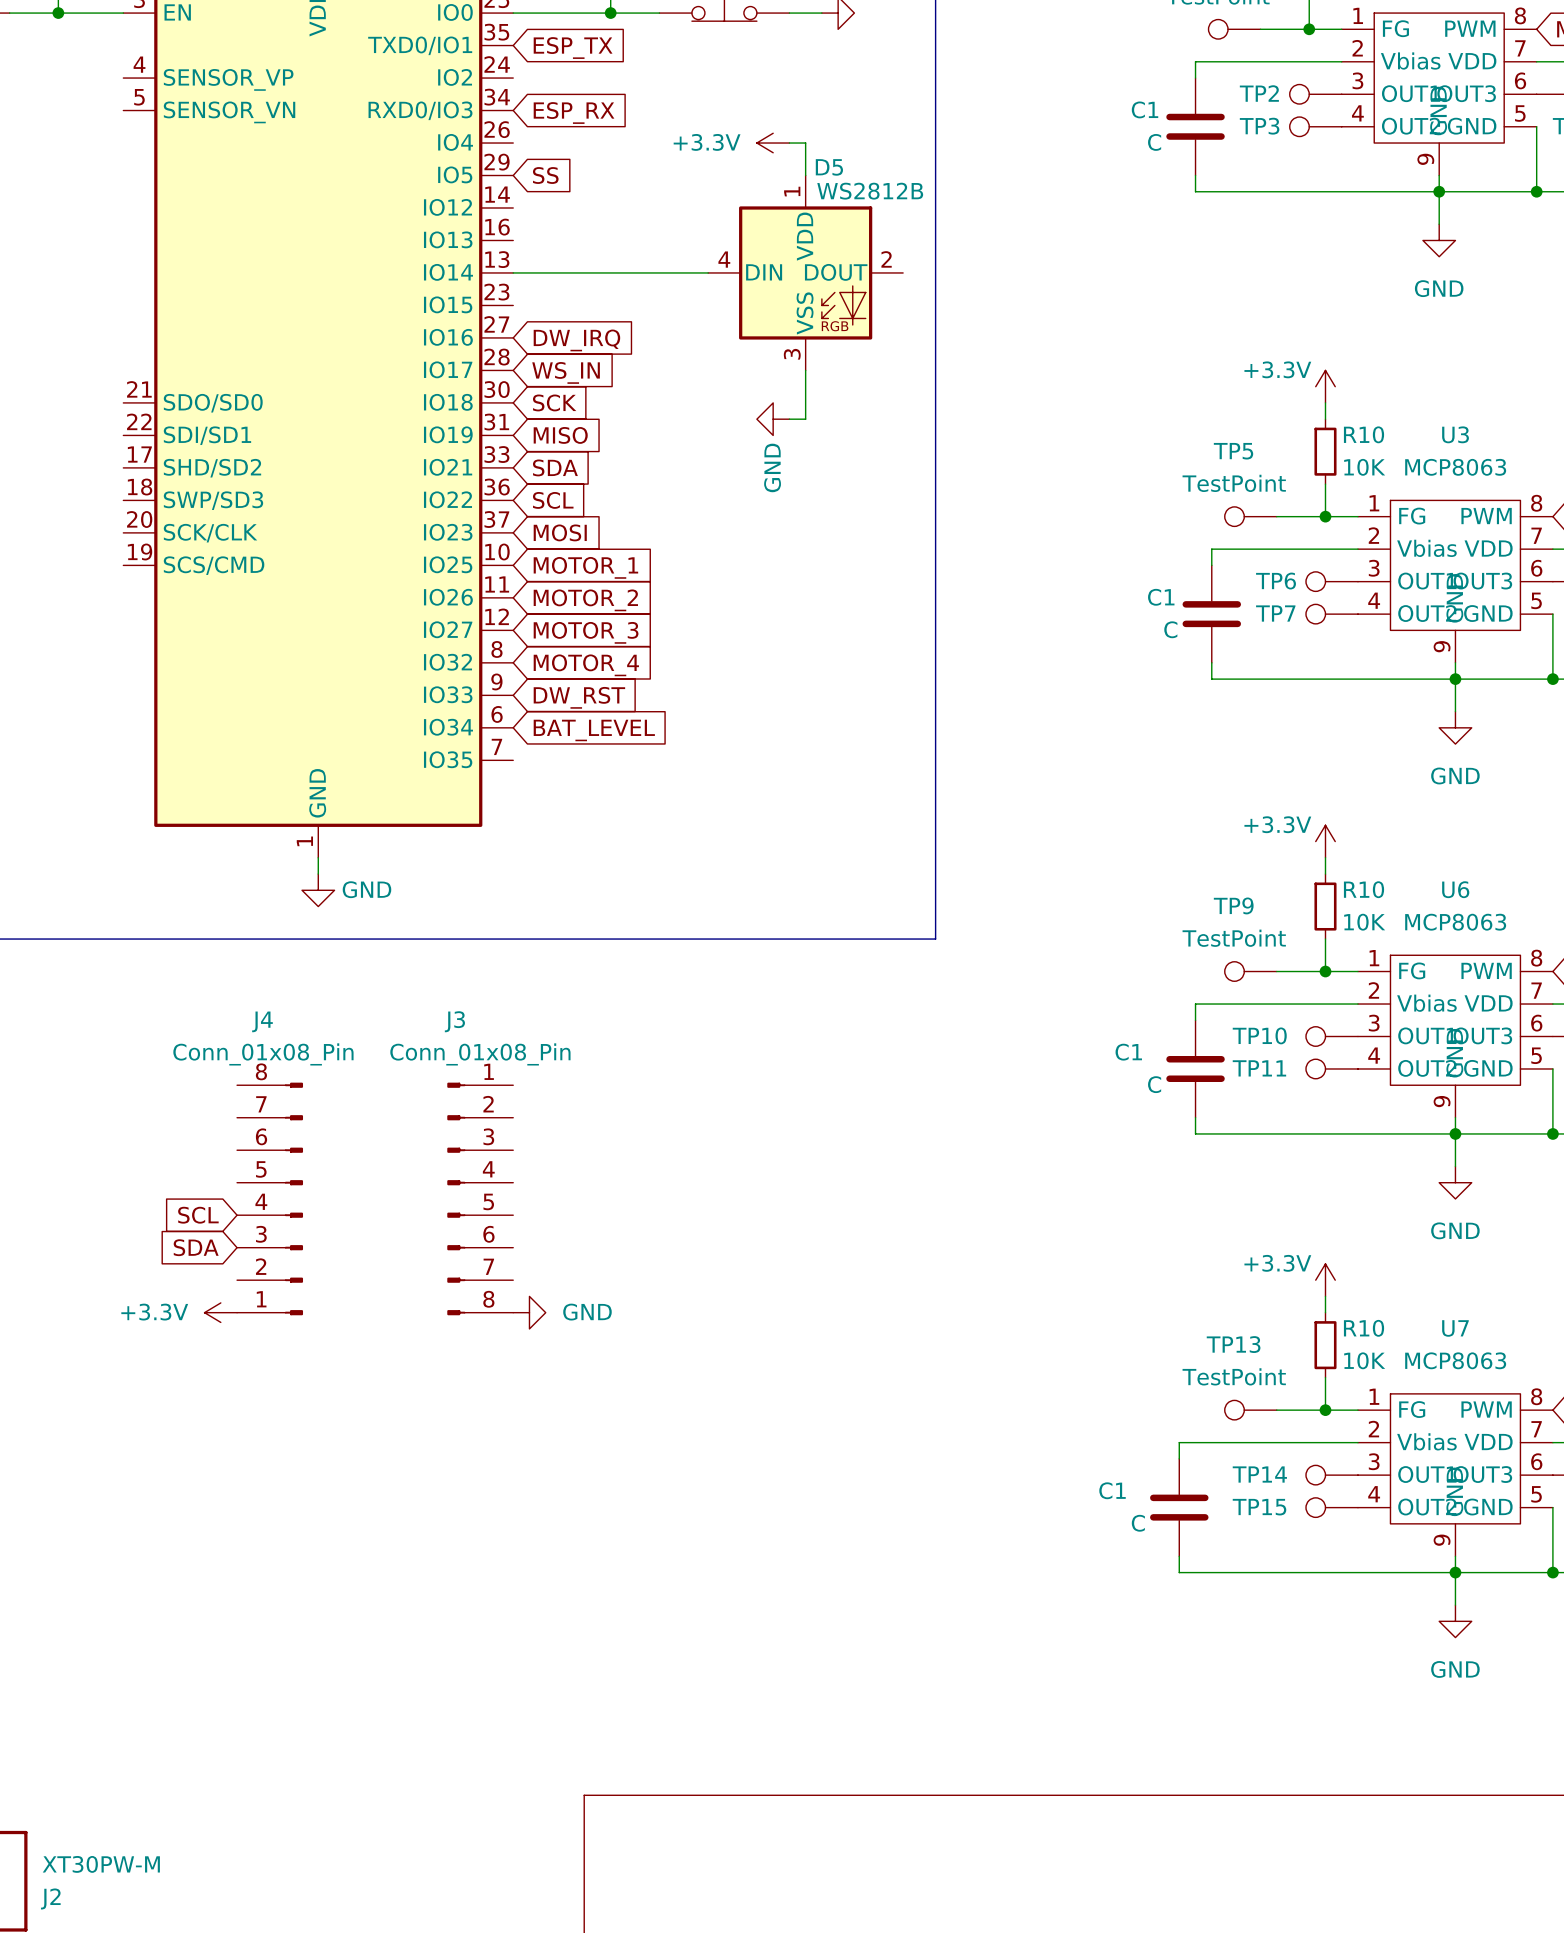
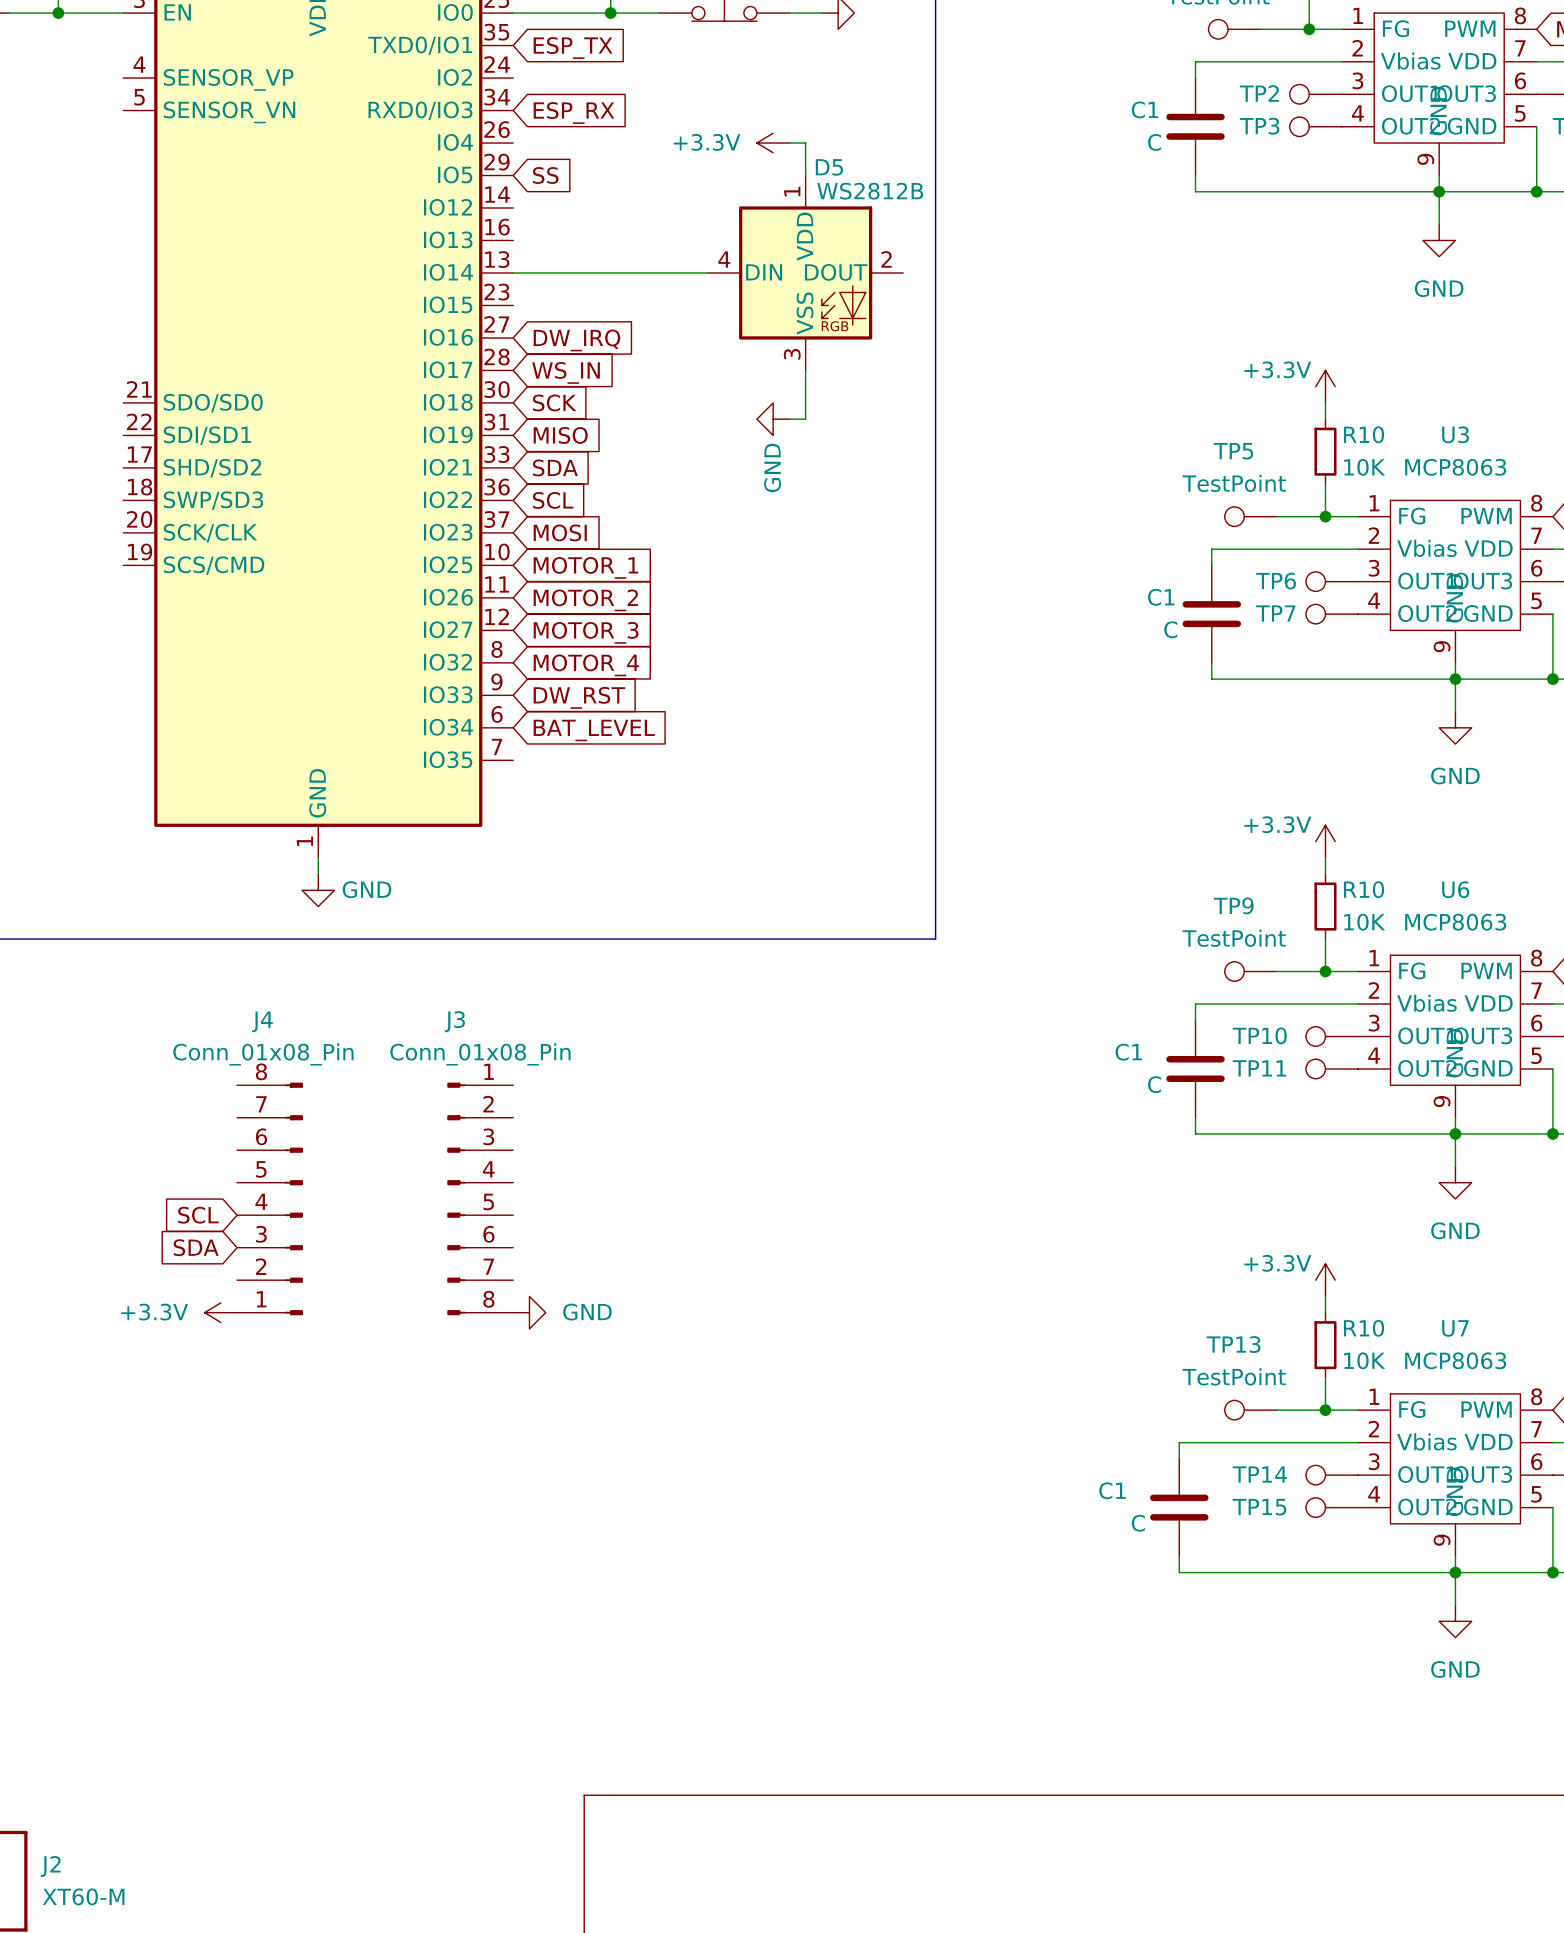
J2 value: XT30PW-M (101, 1864) -> XT60-M (83, 1896)
J2 name position: J2 (50, 1898) -> J2 (50, 1866)

